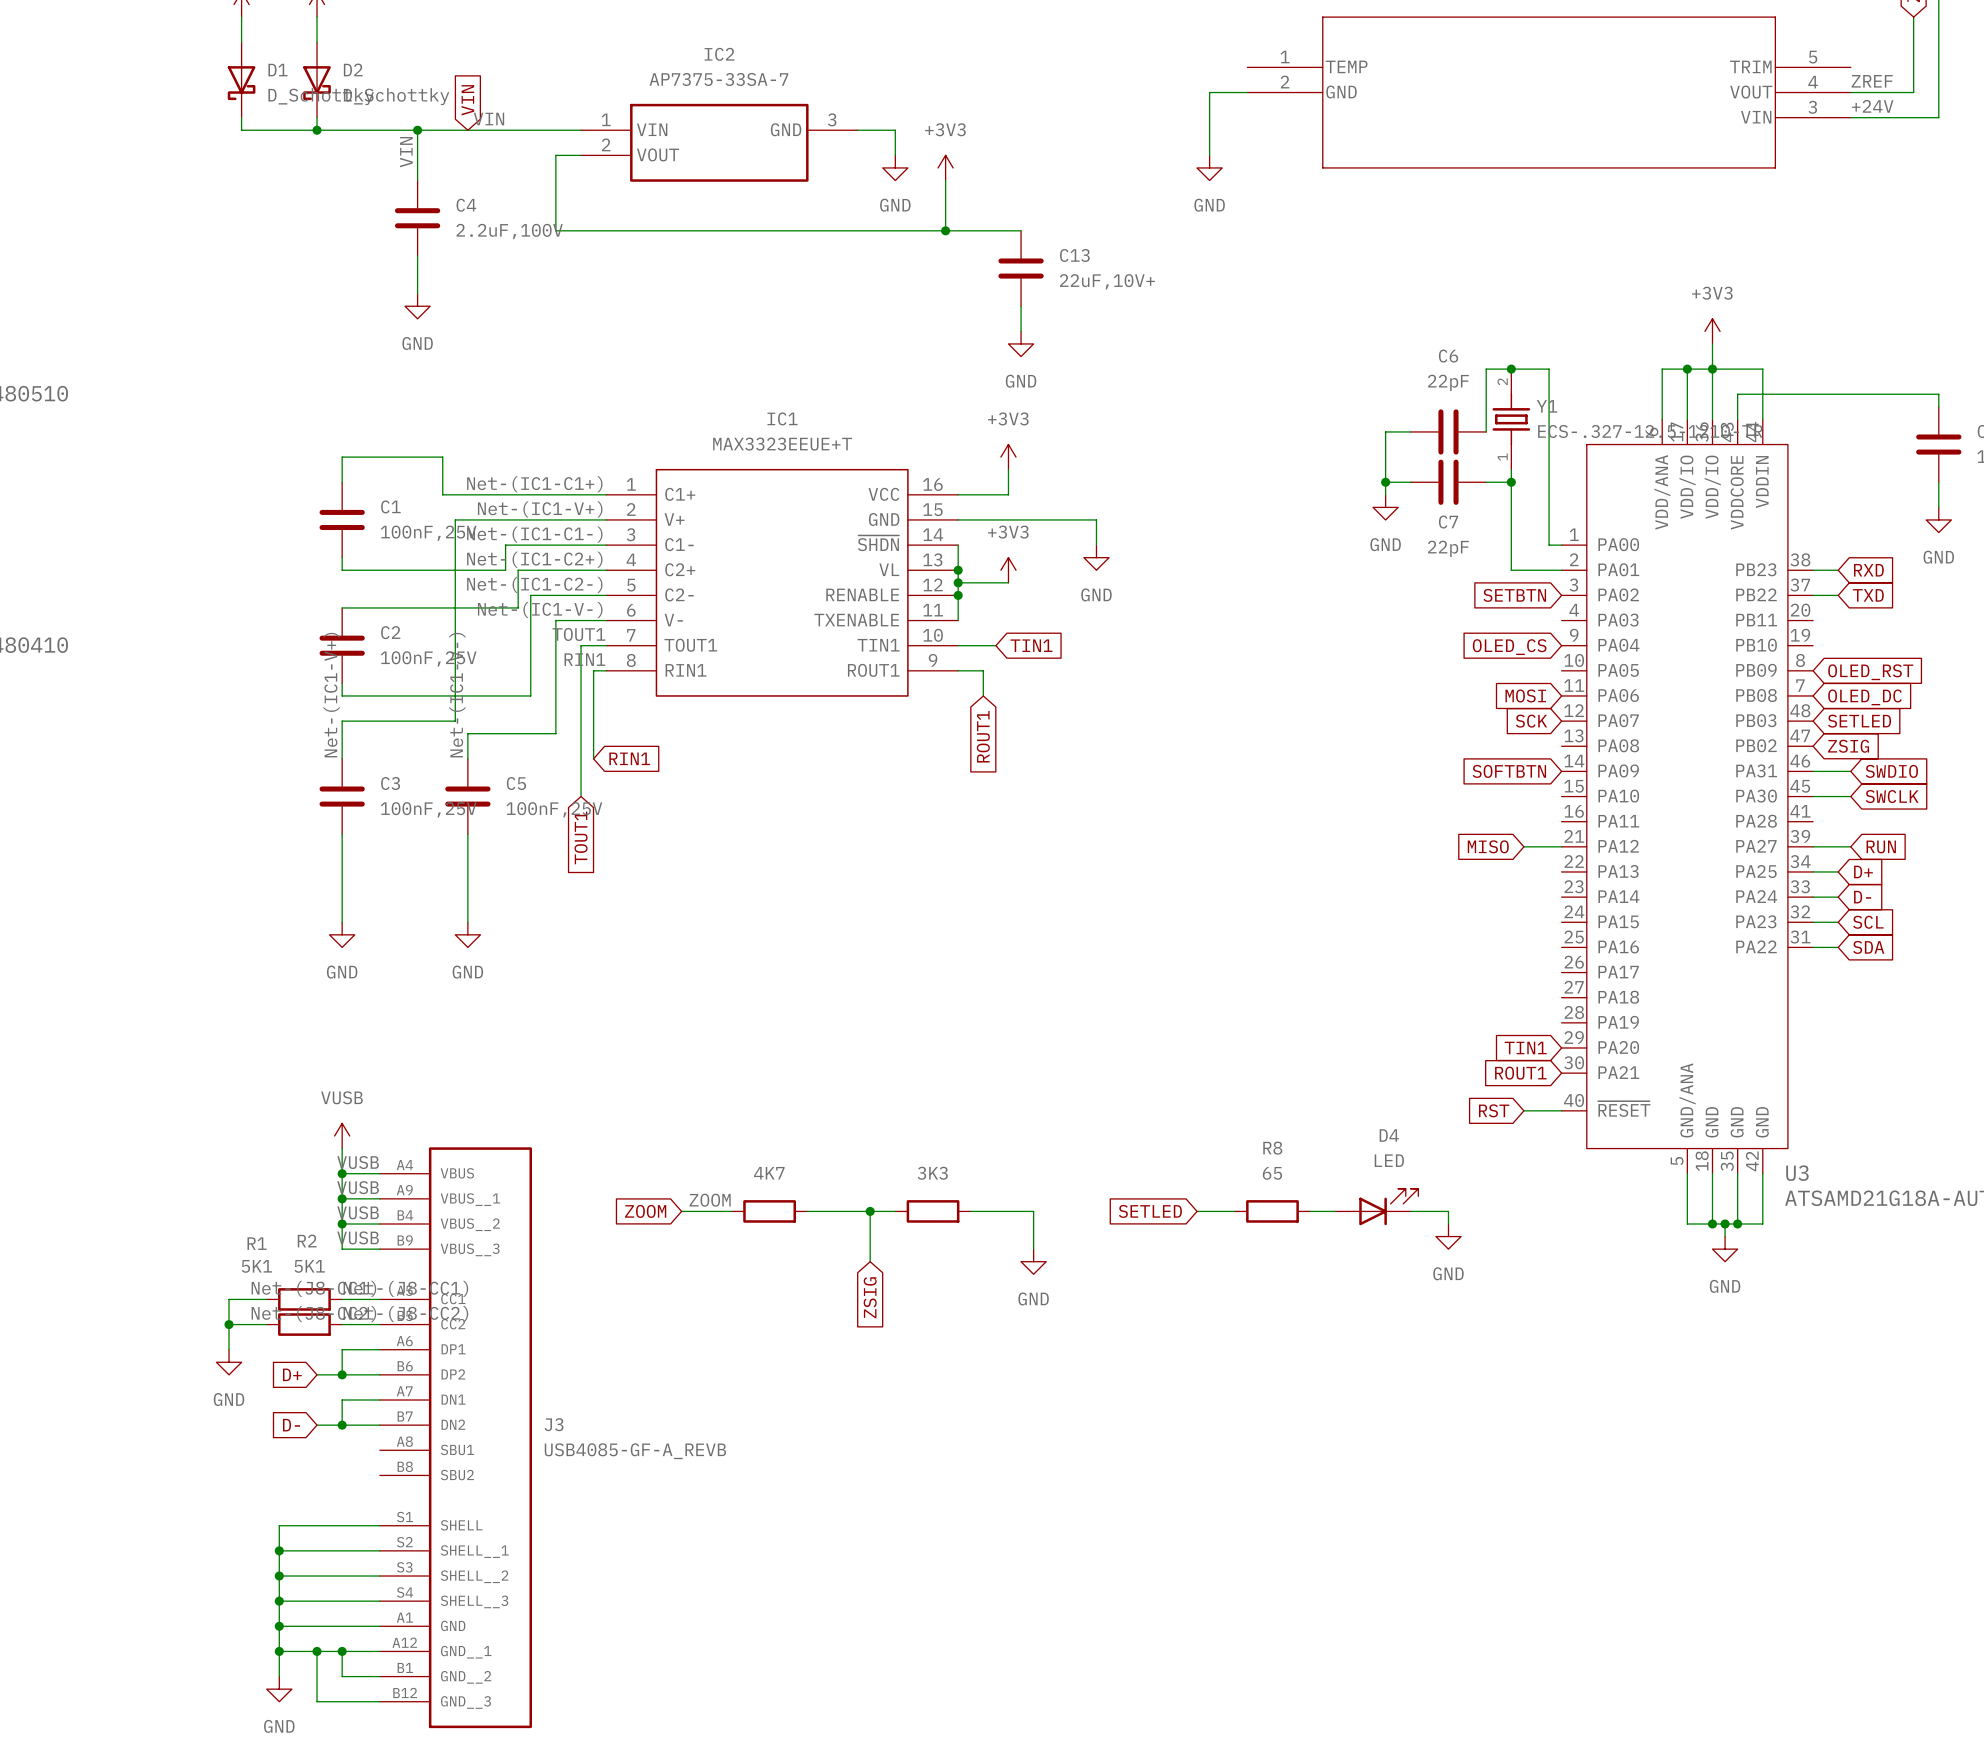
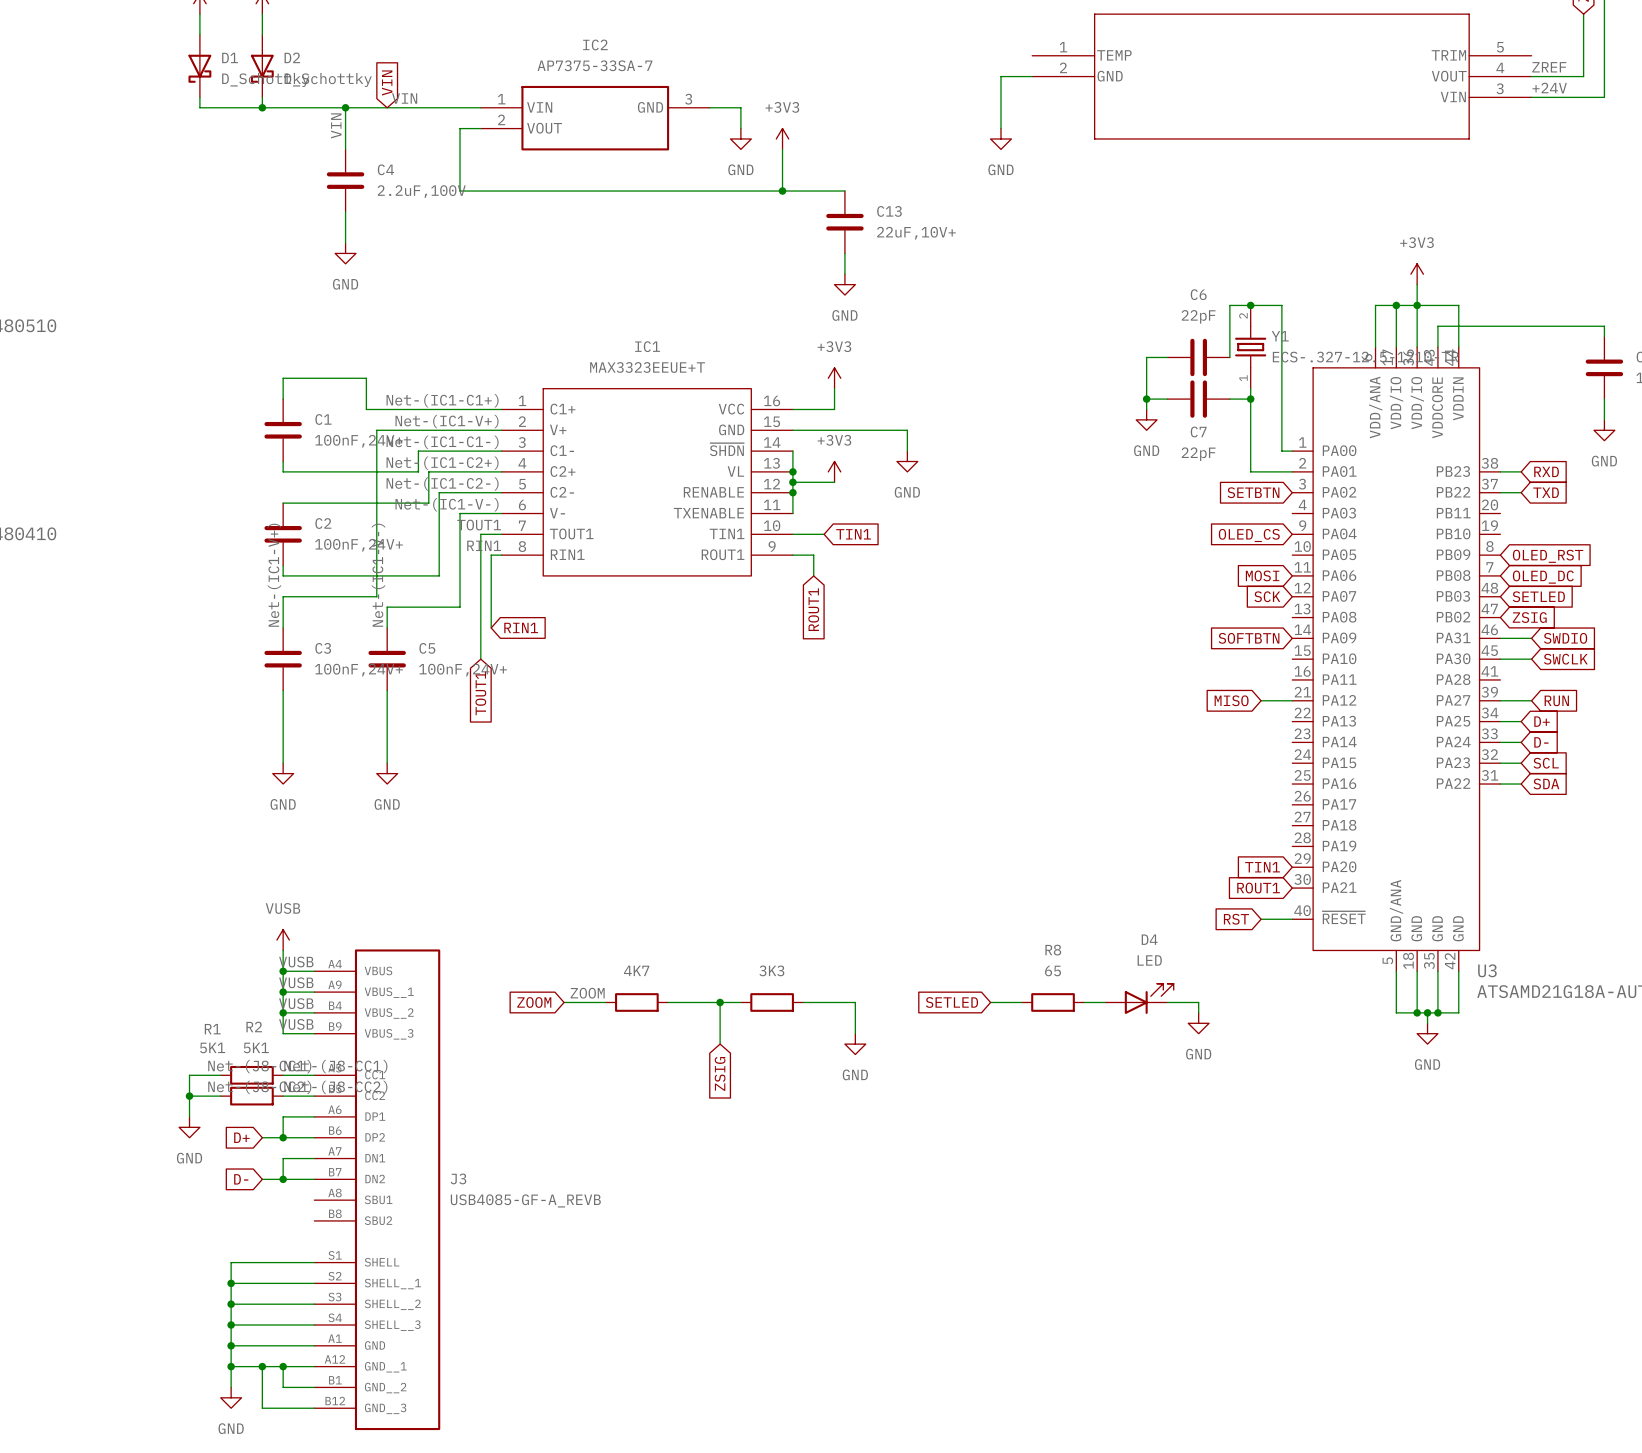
C1 value: 100nF,25V (428, 533) -> 100nF,24V+ (359, 441)
C2 value: 100nF,25V (428, 658) -> 100nF,24V+ (359, 545)
C3 value: 100nF,25V (428, 809) -> 100nF,24V+ (359, 670)
C5 value: 100nF,25V (554, 809) -> 100nF,24V+ (463, 670)

